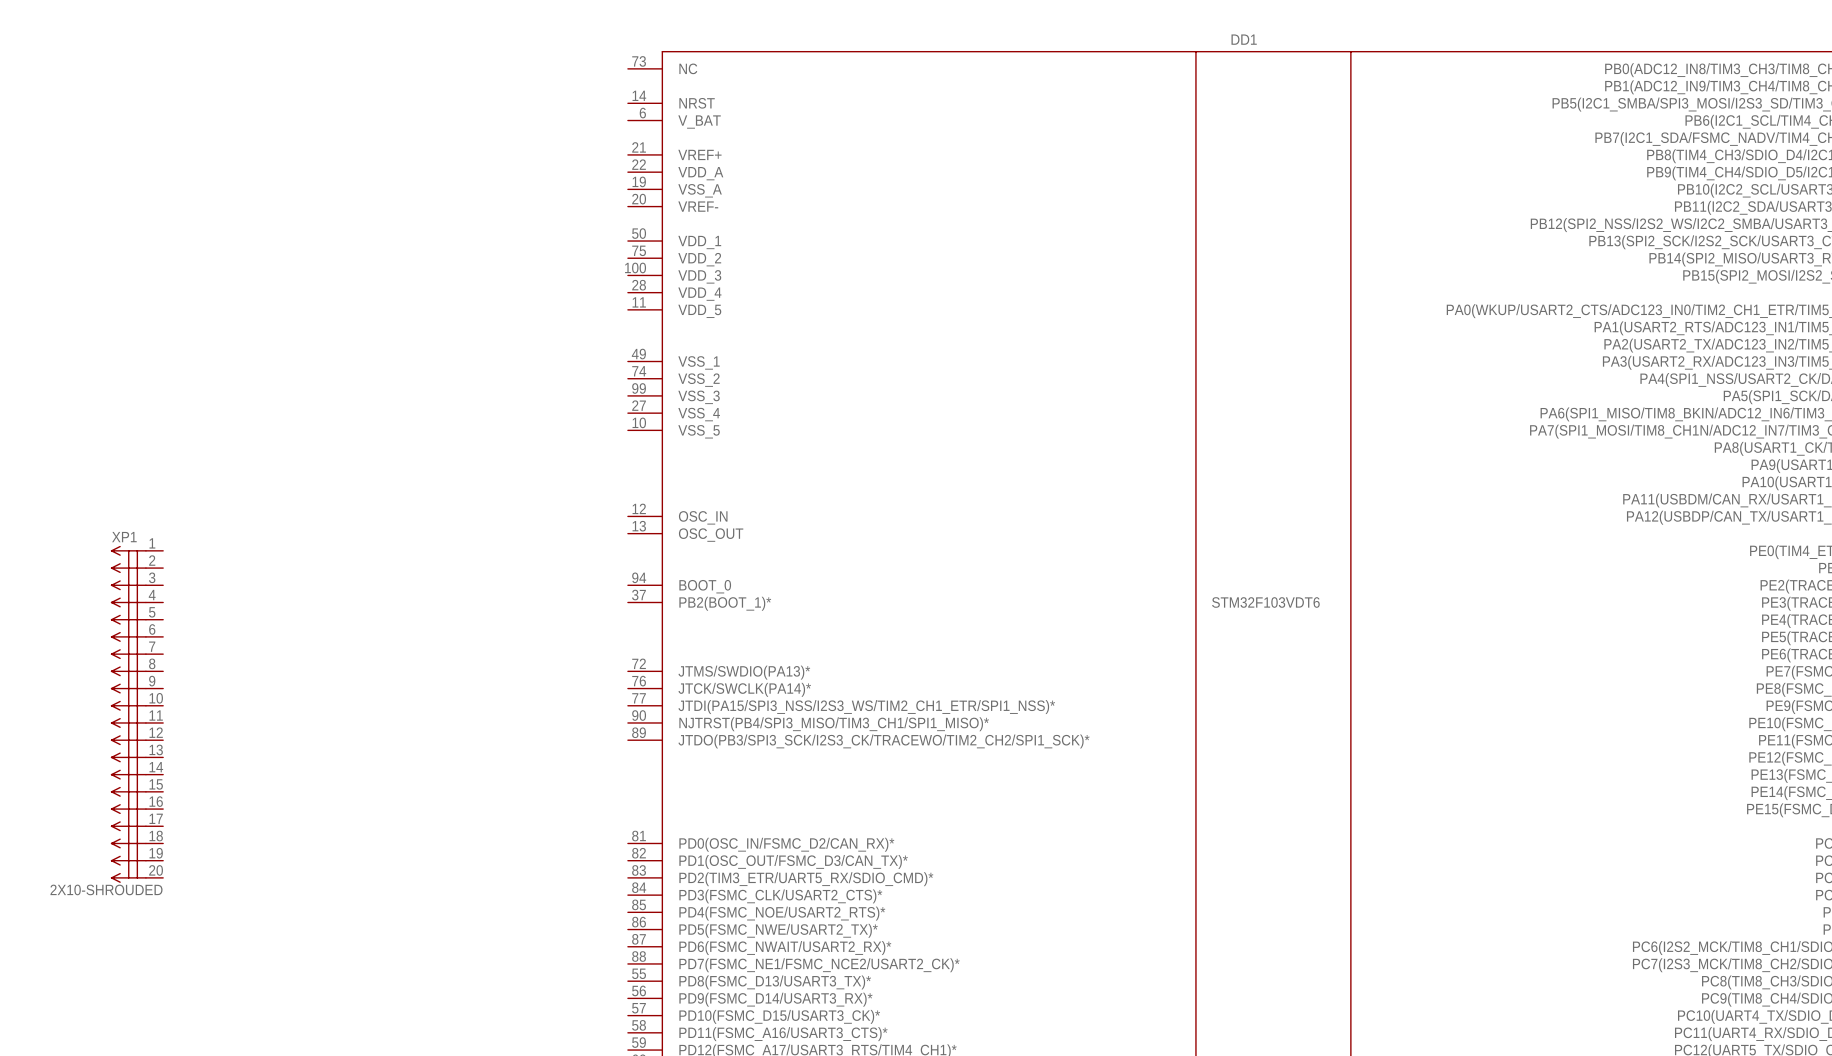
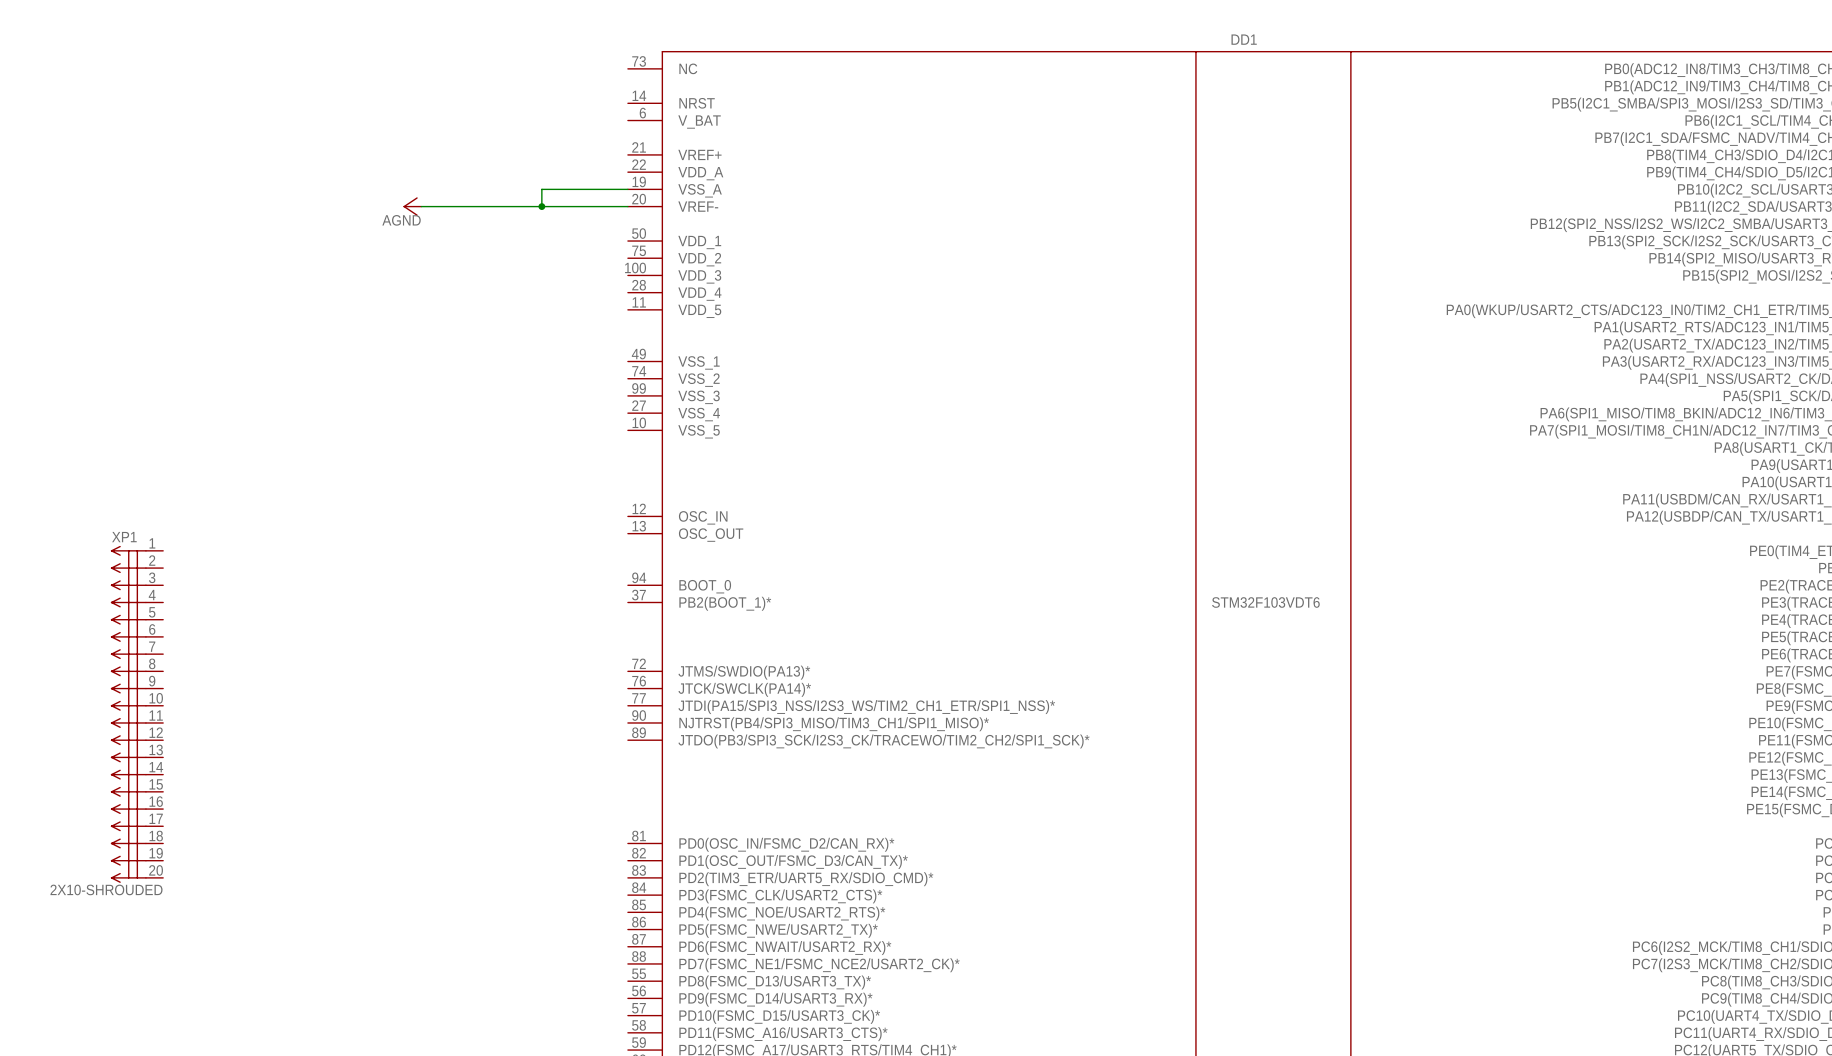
wire: none -> (627, 189) (541, 189) (541, 206)
power symbol: none -> AGND (412, 206)
wire: none -> (421, 206) (627, 206)
junction: none -> (541, 206)

